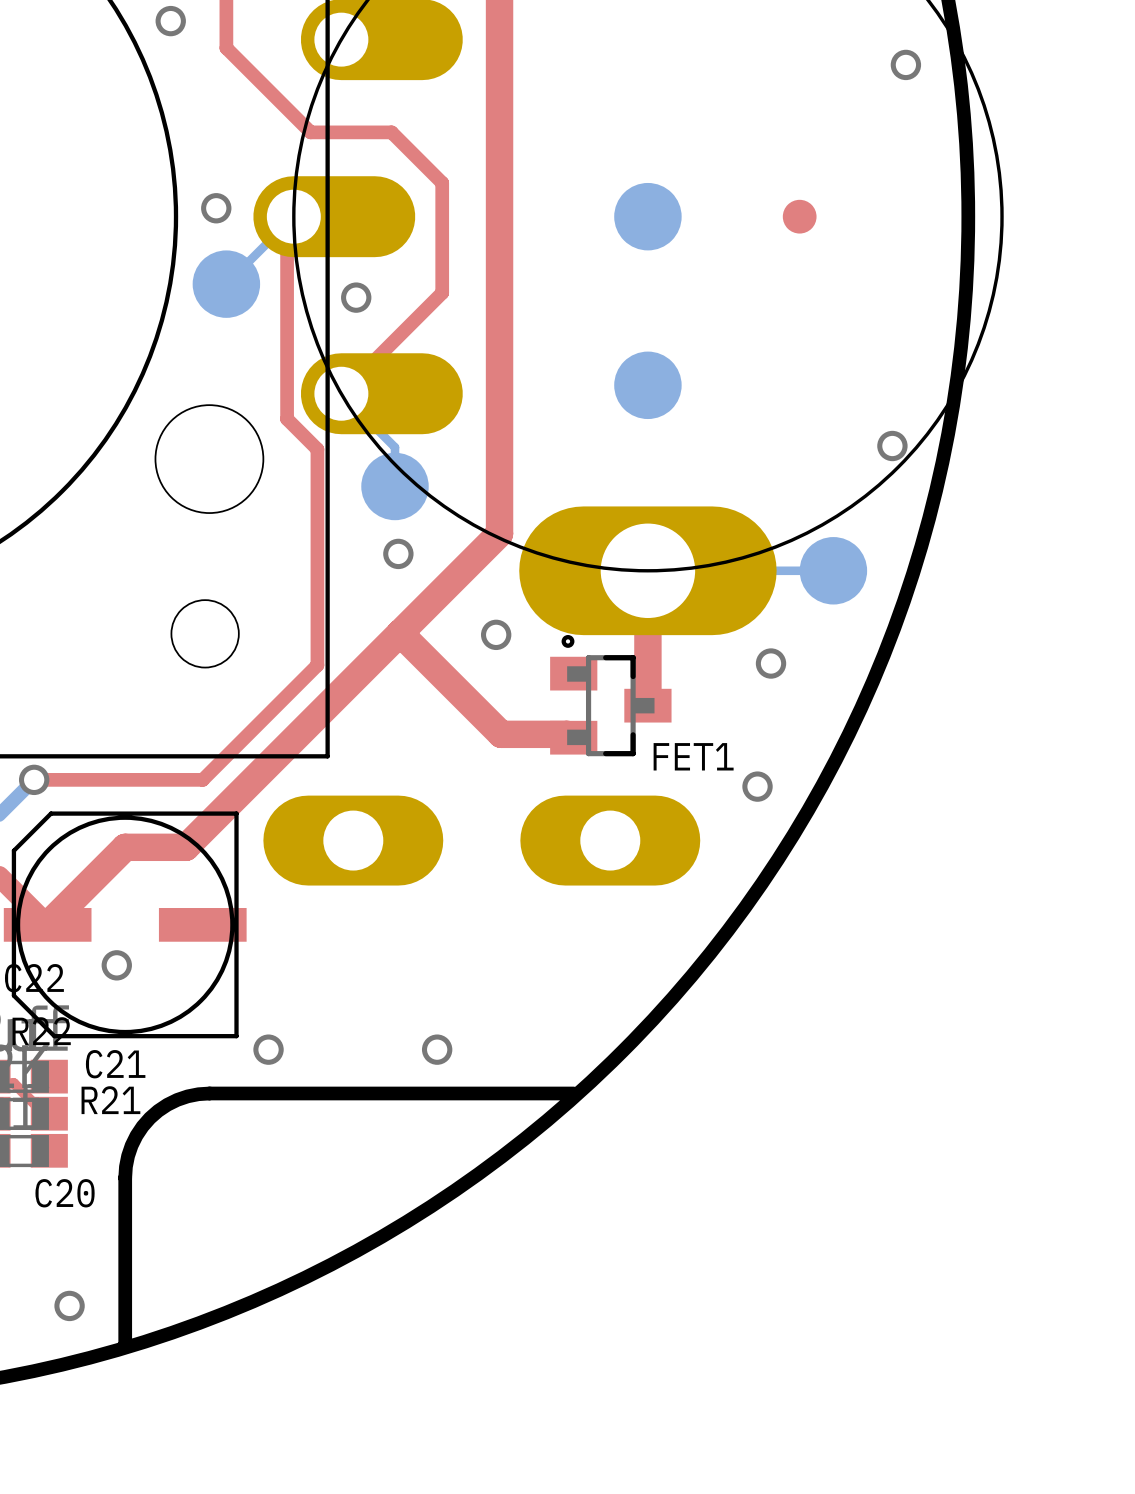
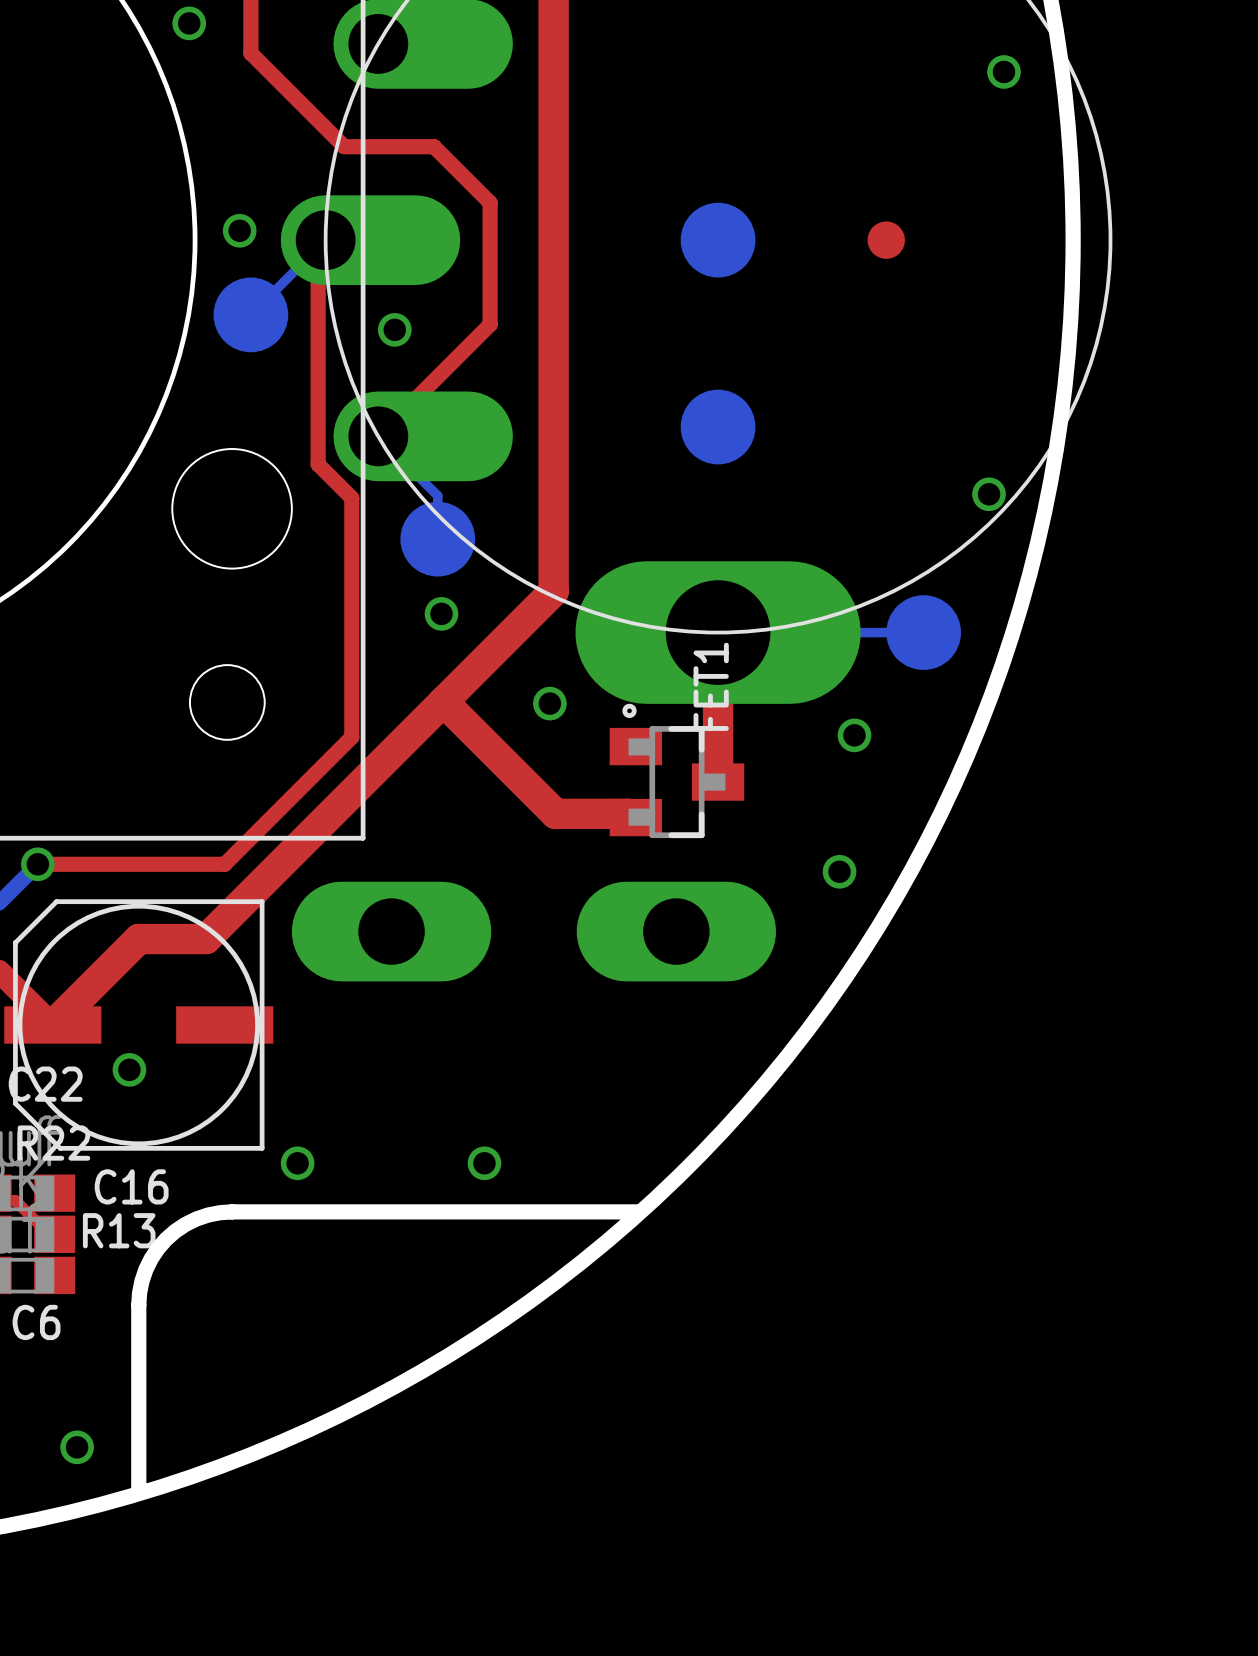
FET1 name rotation: 0° (693, 756) -> 90° counterclockwise (711, 686)
FET1 name position: FET1 (693, 756) -> FET1 (711, 686)
C21 name: C21 (115, 1064) -> C16 (131, 1186)
R21 name: R21 (110, 1100) -> R13 (119, 1230)
C20 name: C20 (65, 1193) -> C6 (36, 1322)

